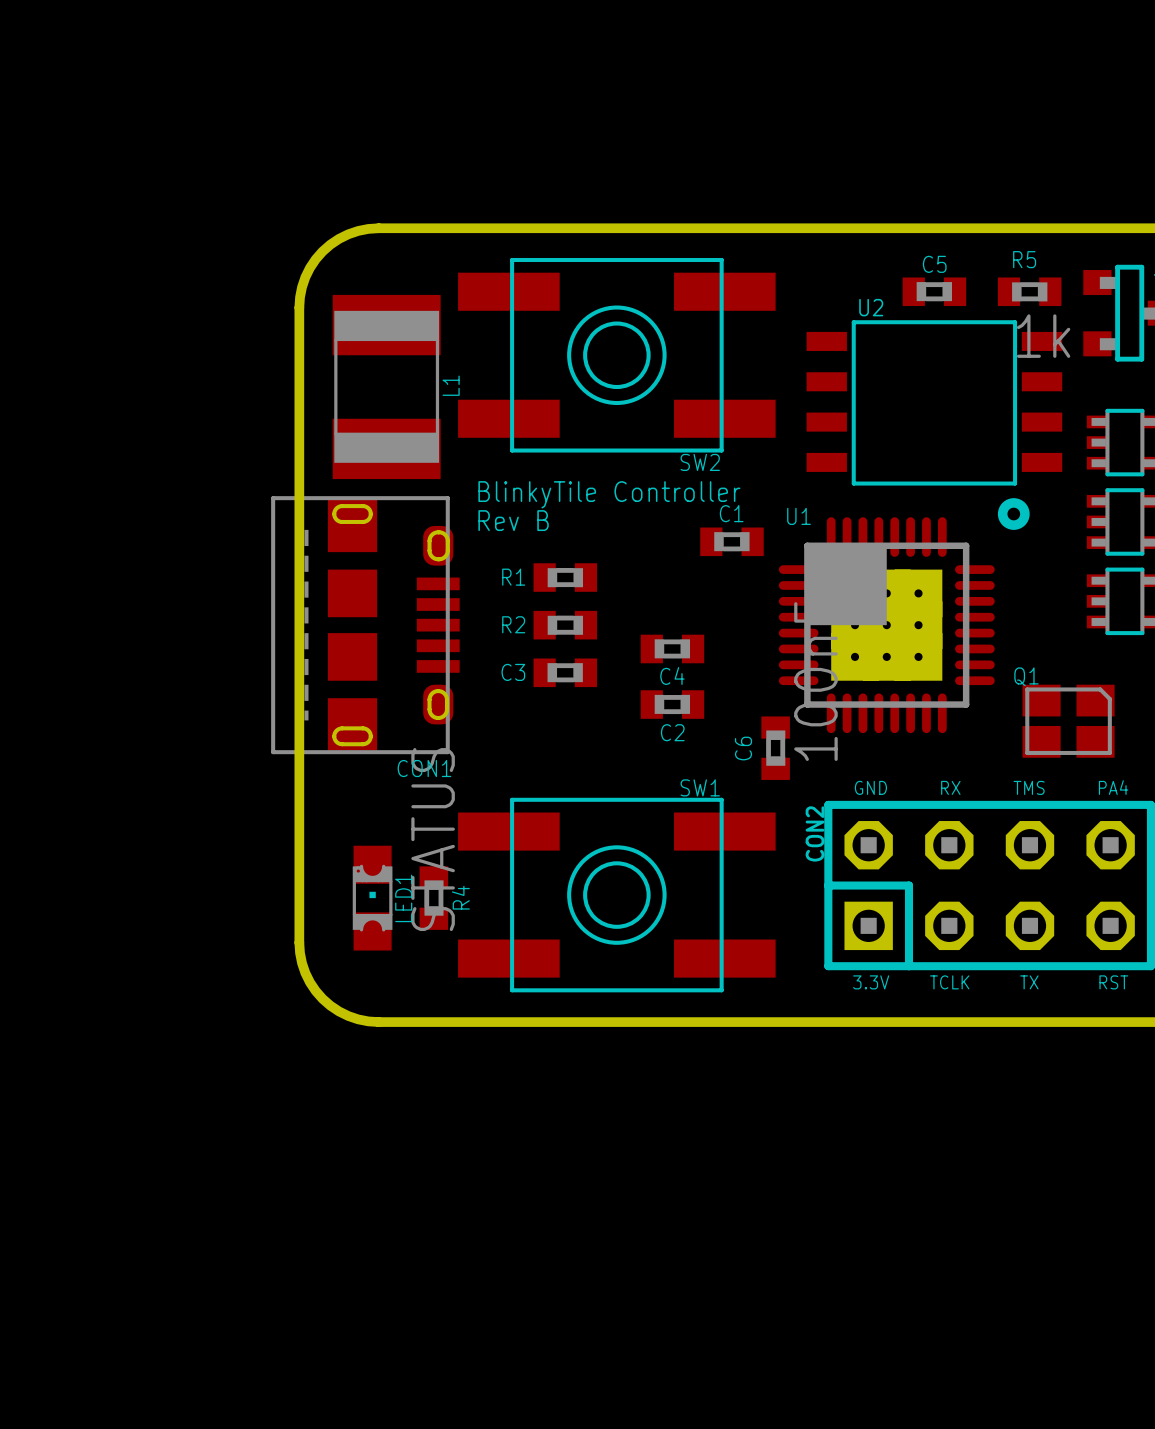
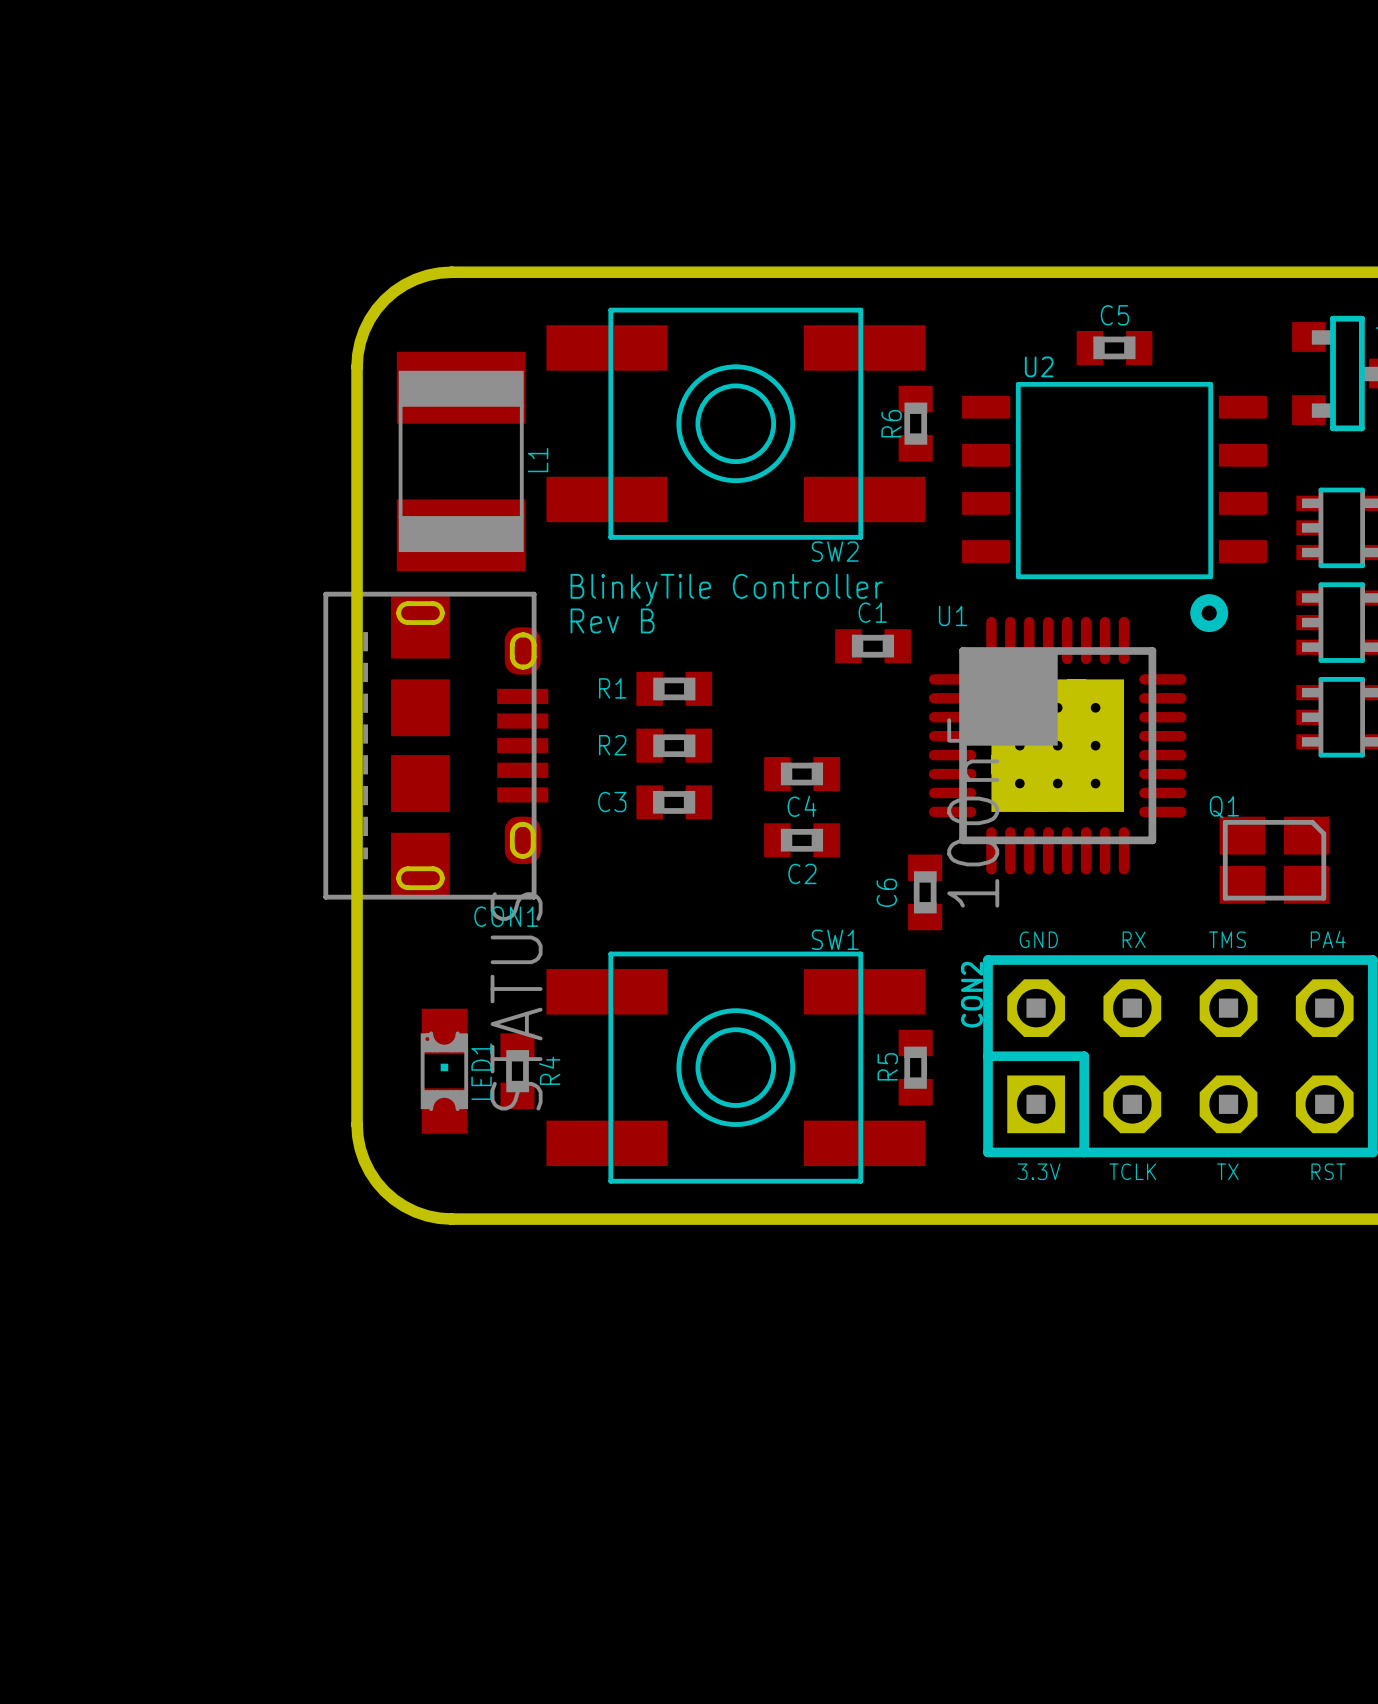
R5 rotation: 0° (1029, 291) -> 90° clockwise (915, 1067)
R5 position: (1029, 291) -> (915, 1067)
R5 value: 1k (1043, 336) -> none
R6: none -> (915, 423)

